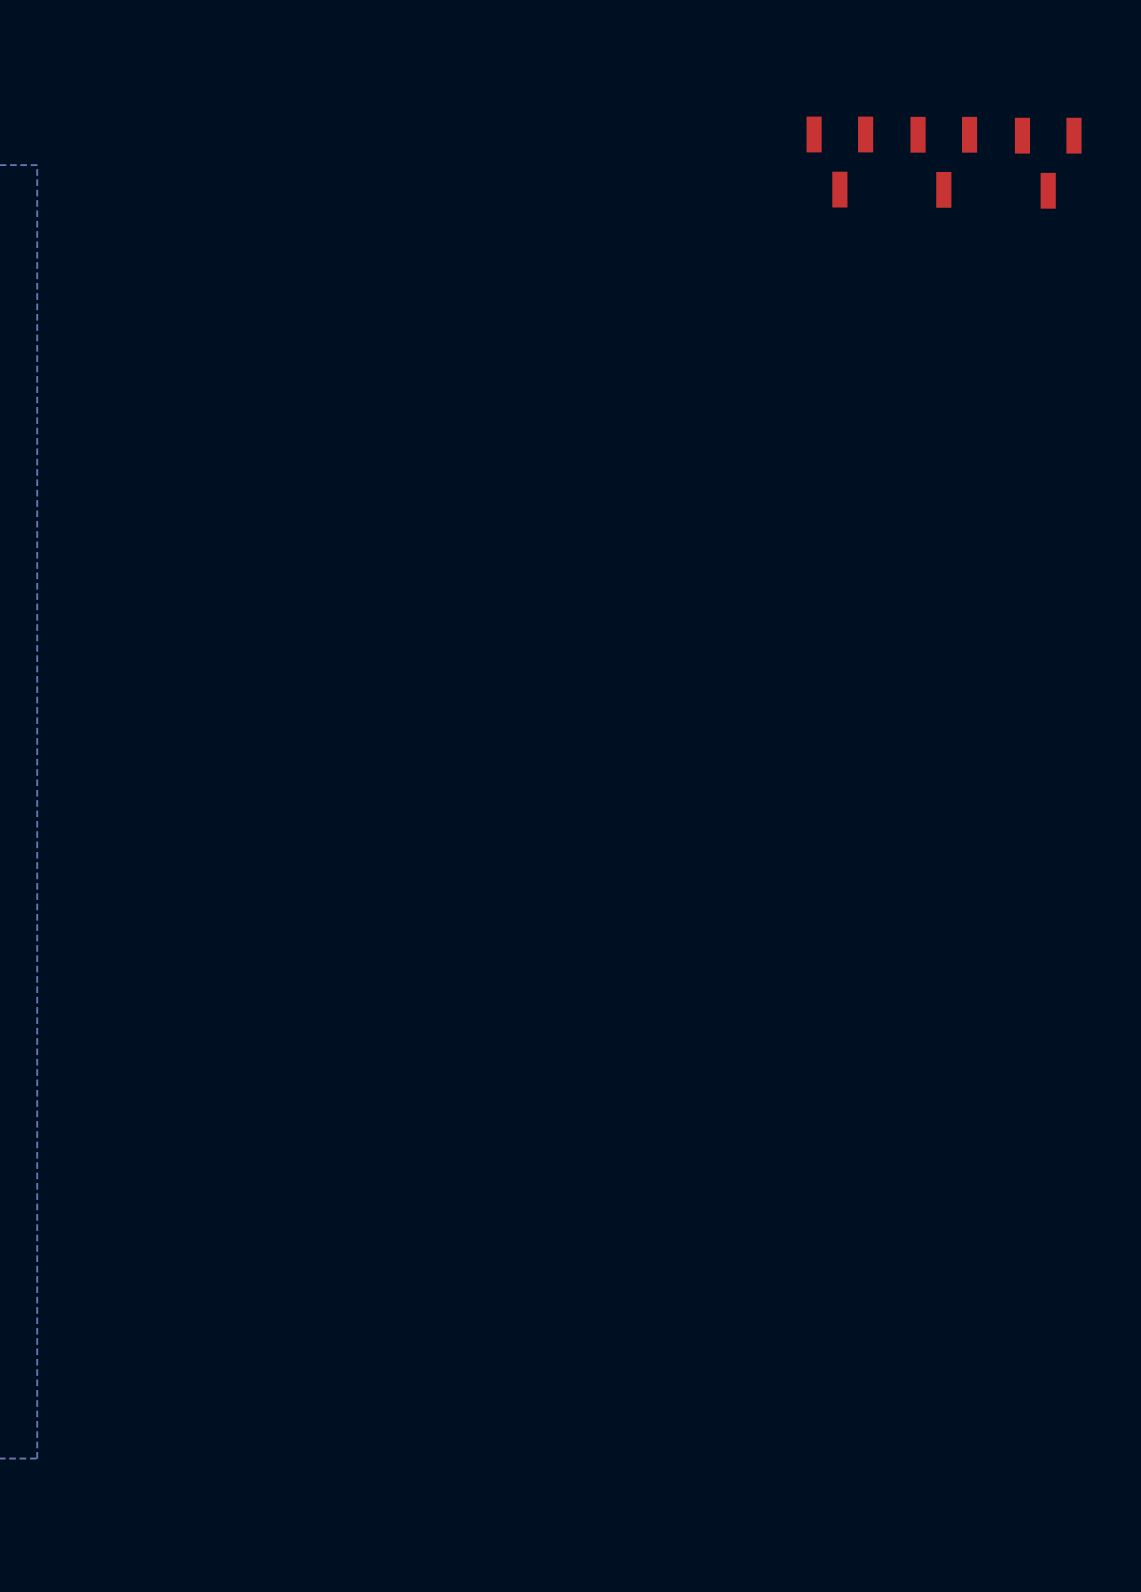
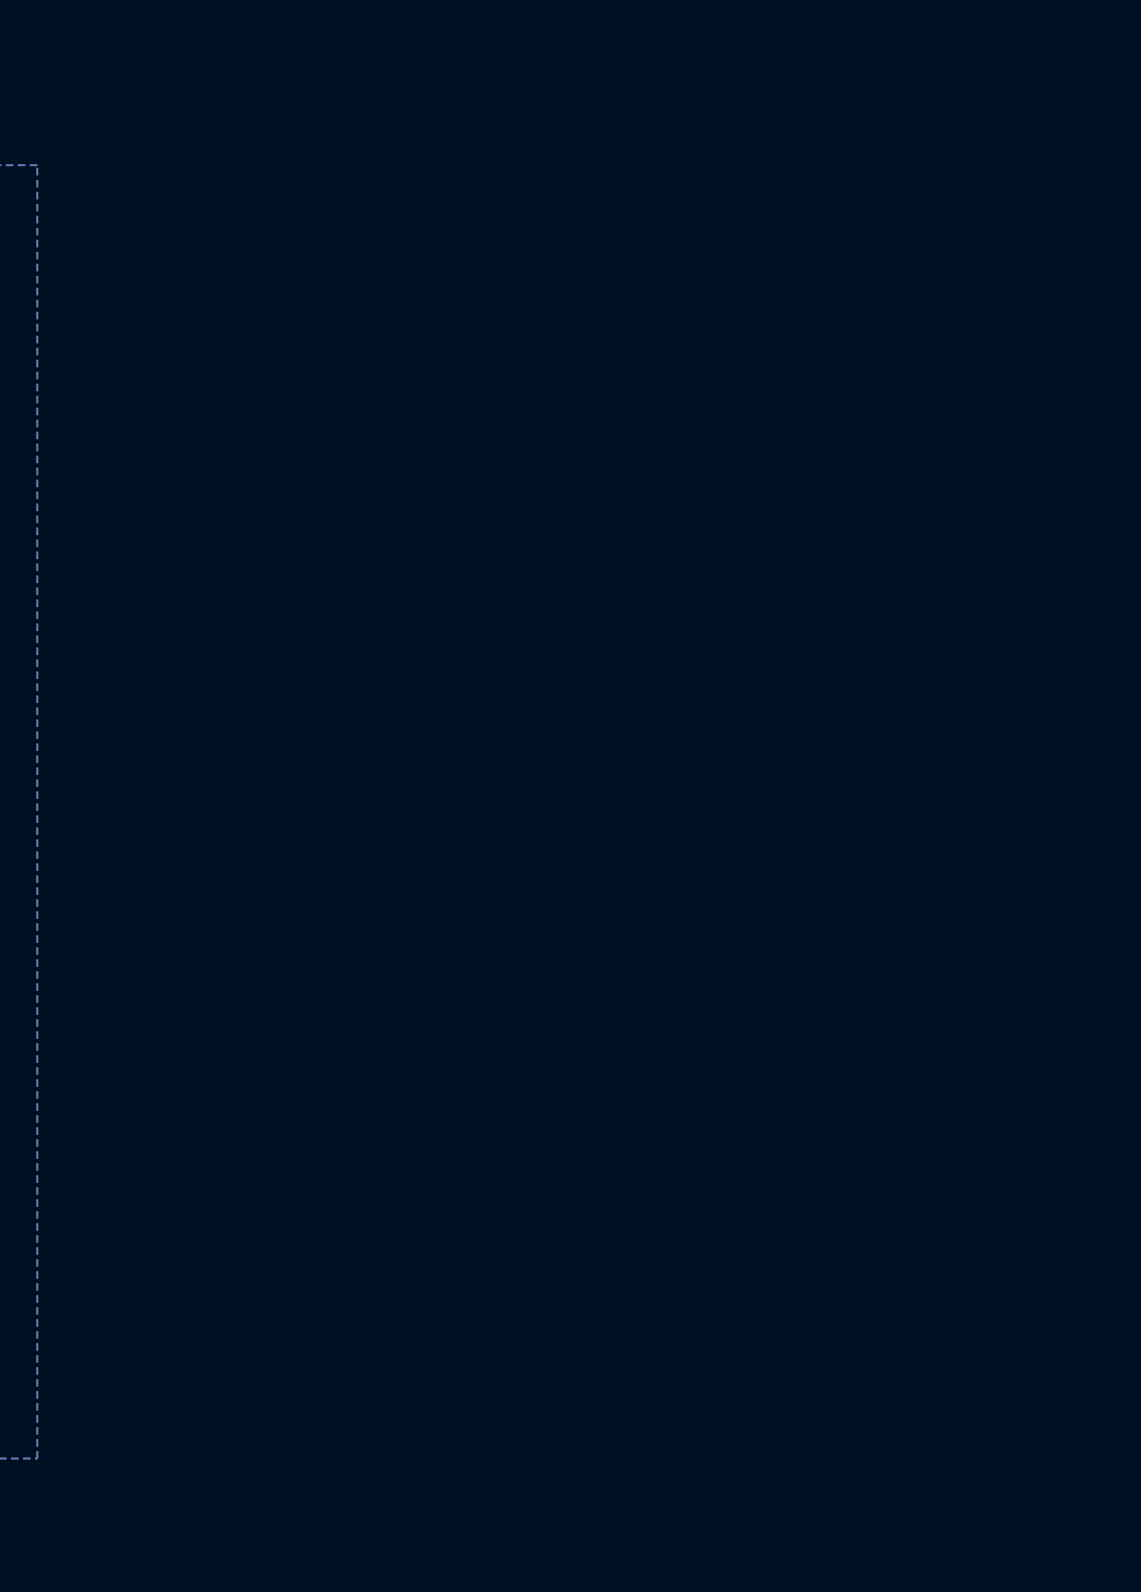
part: (839, 162) -> none
part: (943, 162) -> none
part: (1048, 163) -> none

